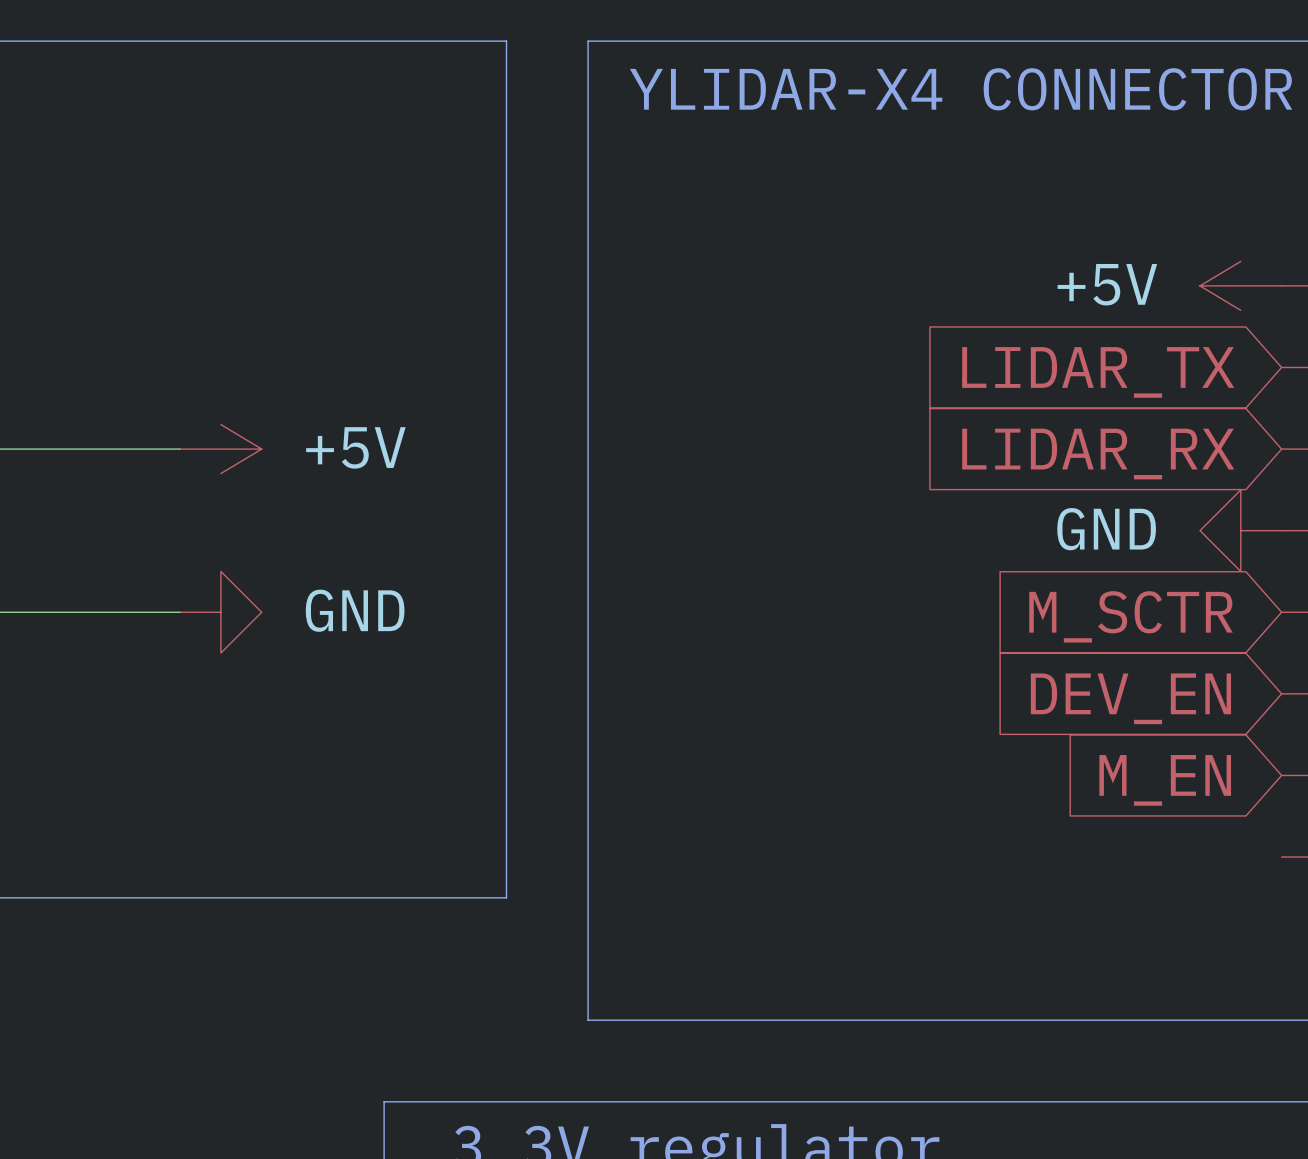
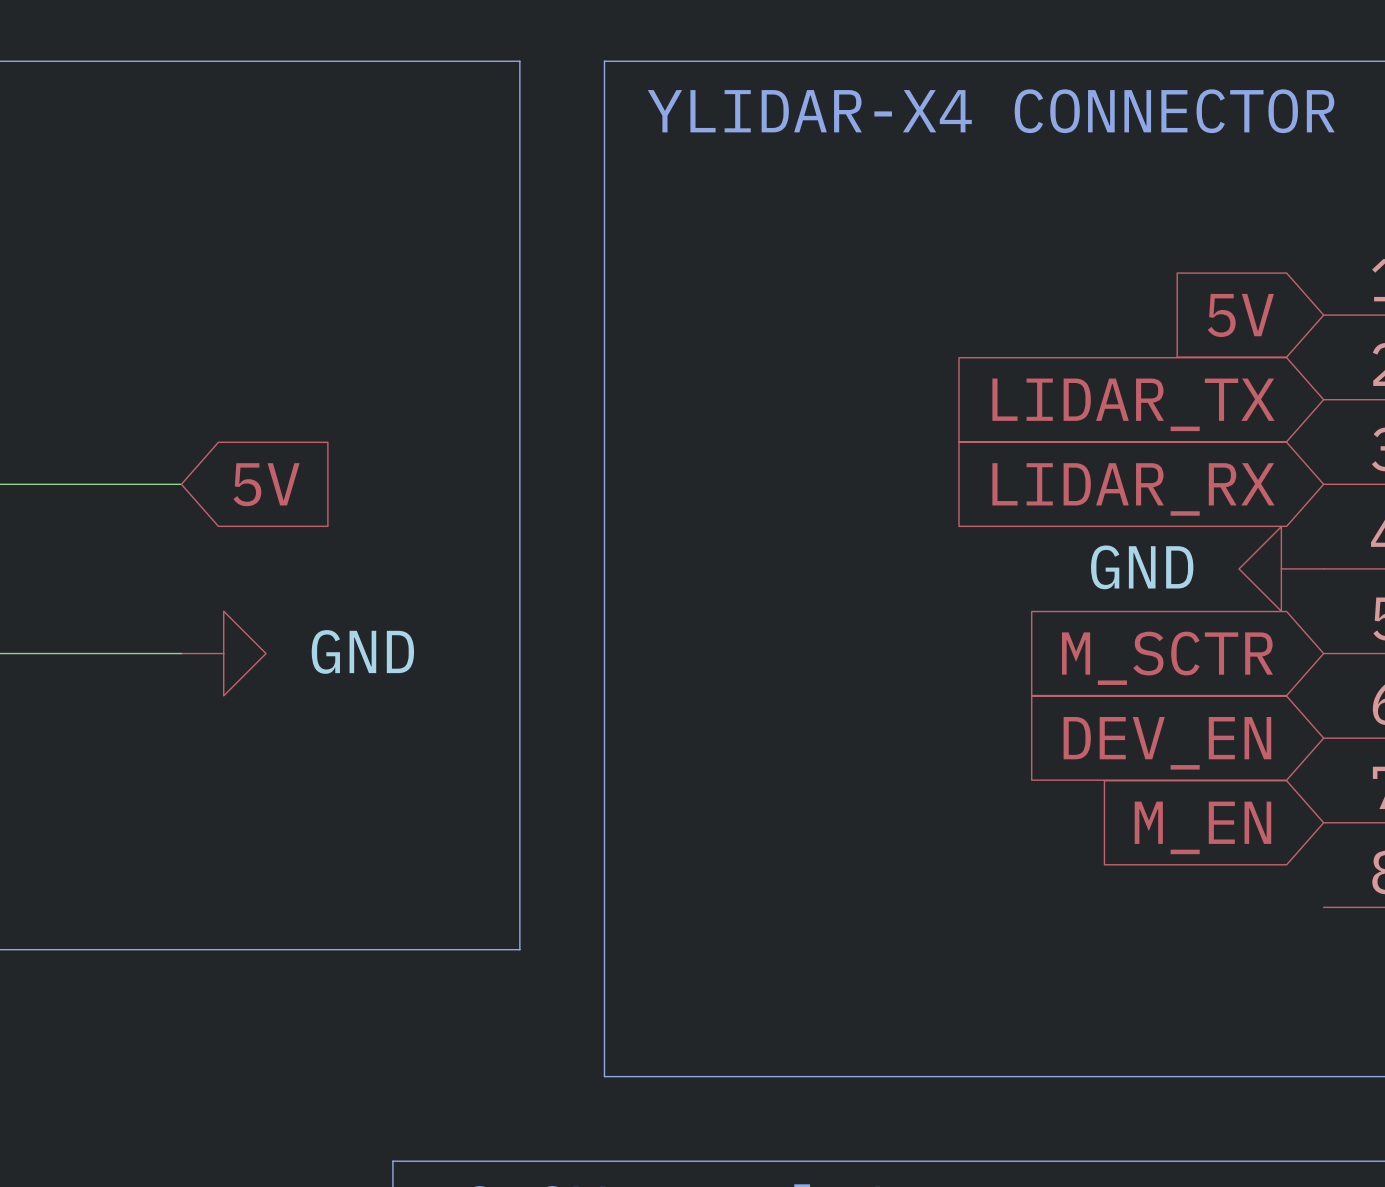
power symbol: +5V (1240, 285) -> none
global label: none -> 5V (1240, 315)
power symbol: +5V (220, 449) -> none
global label: none -> 5V (266, 484)

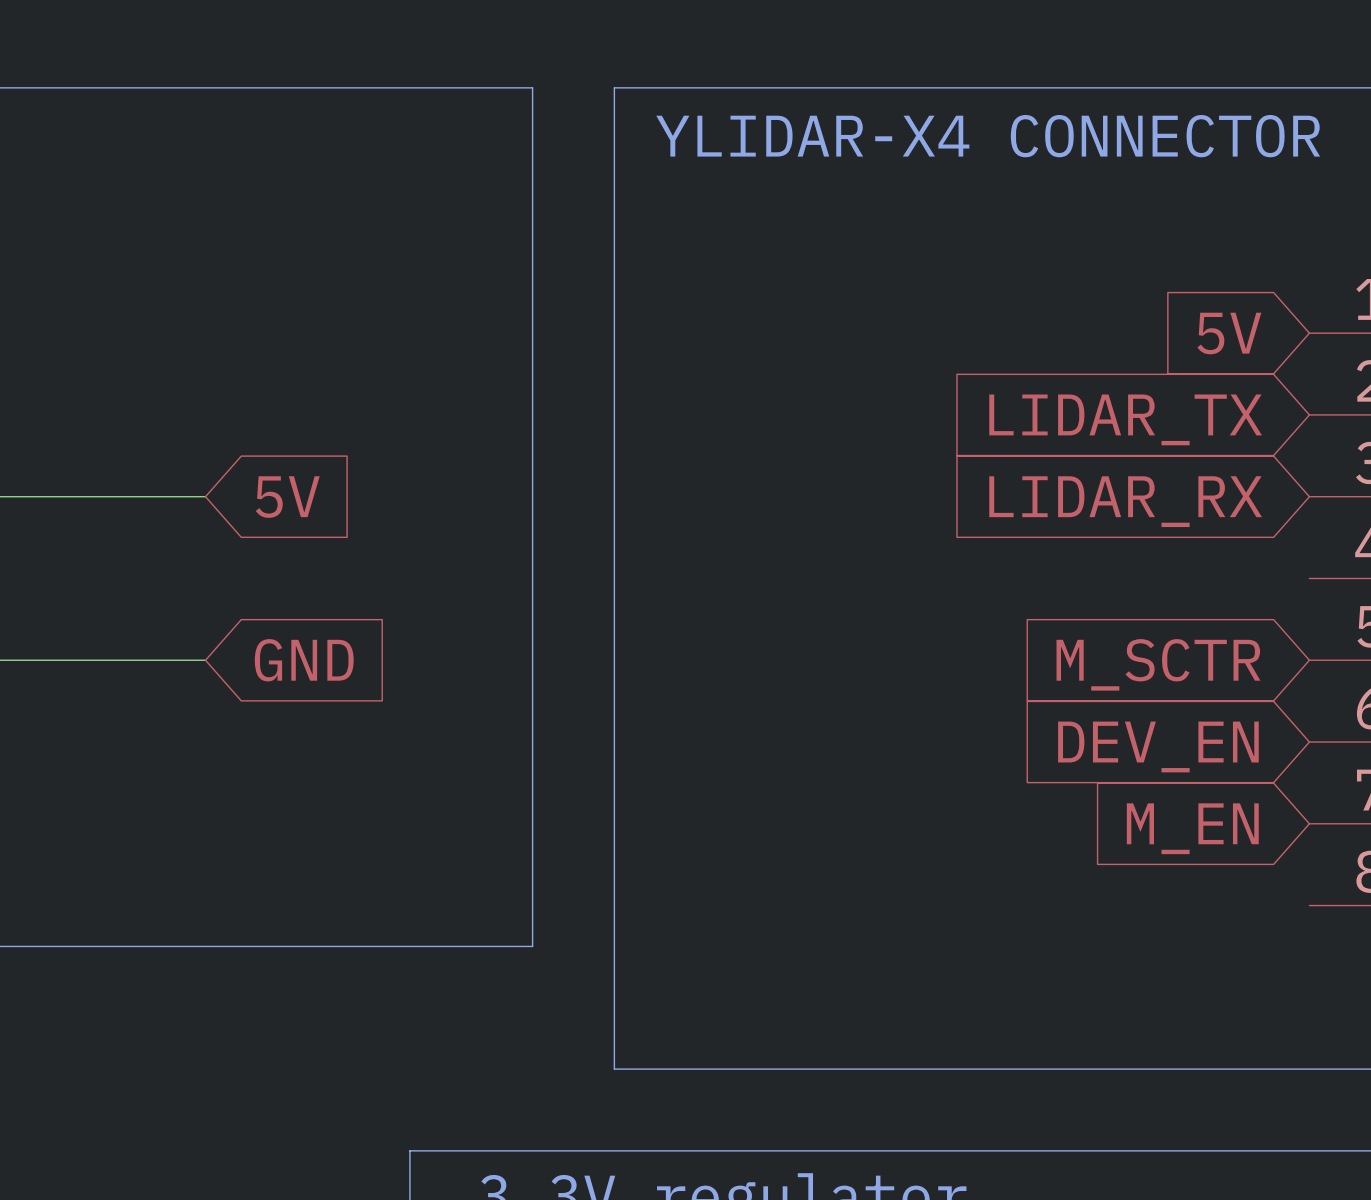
power symbol: GND (1281, 568) -> none
power symbol: GND (223, 653) -> none
global label: none -> GND (304, 660)

